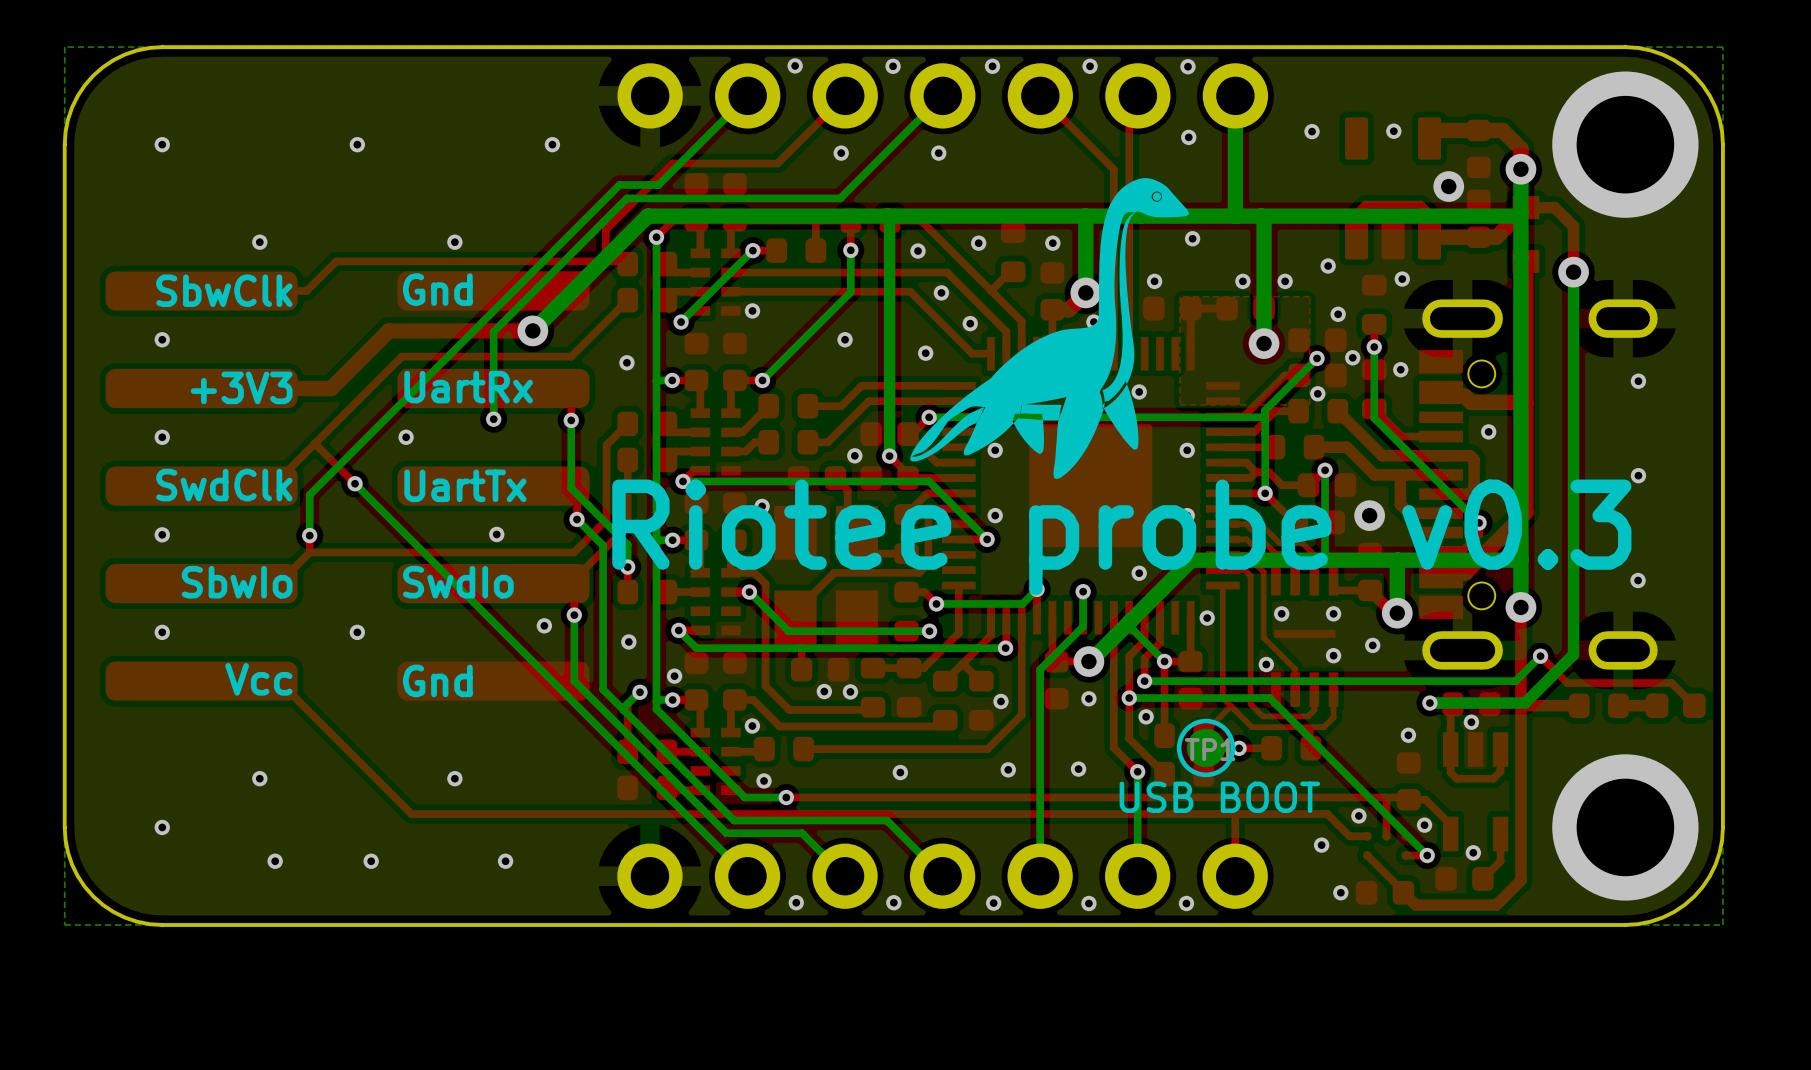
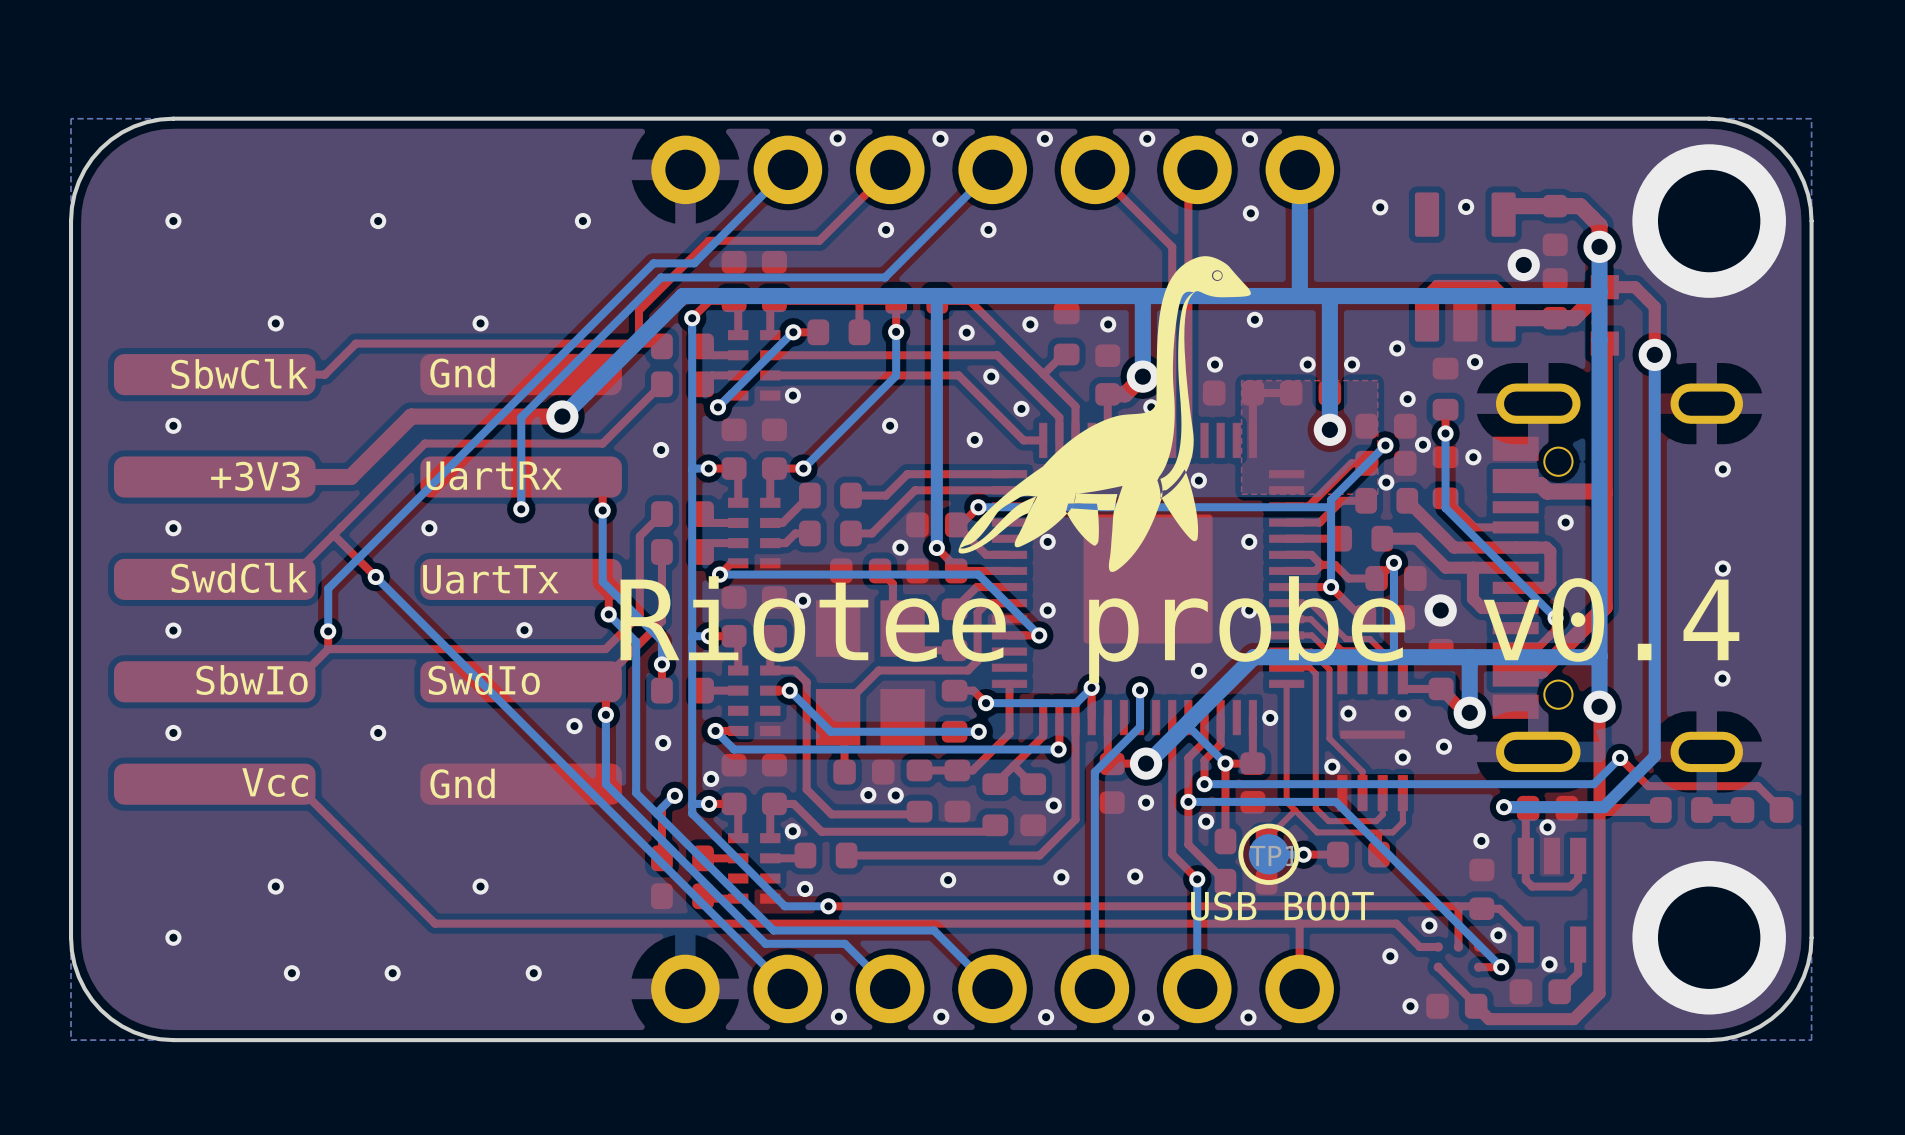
text: Riotee probe v0.3 (1121, 537) -> Riotee probe v0.4 (1179, 629)

